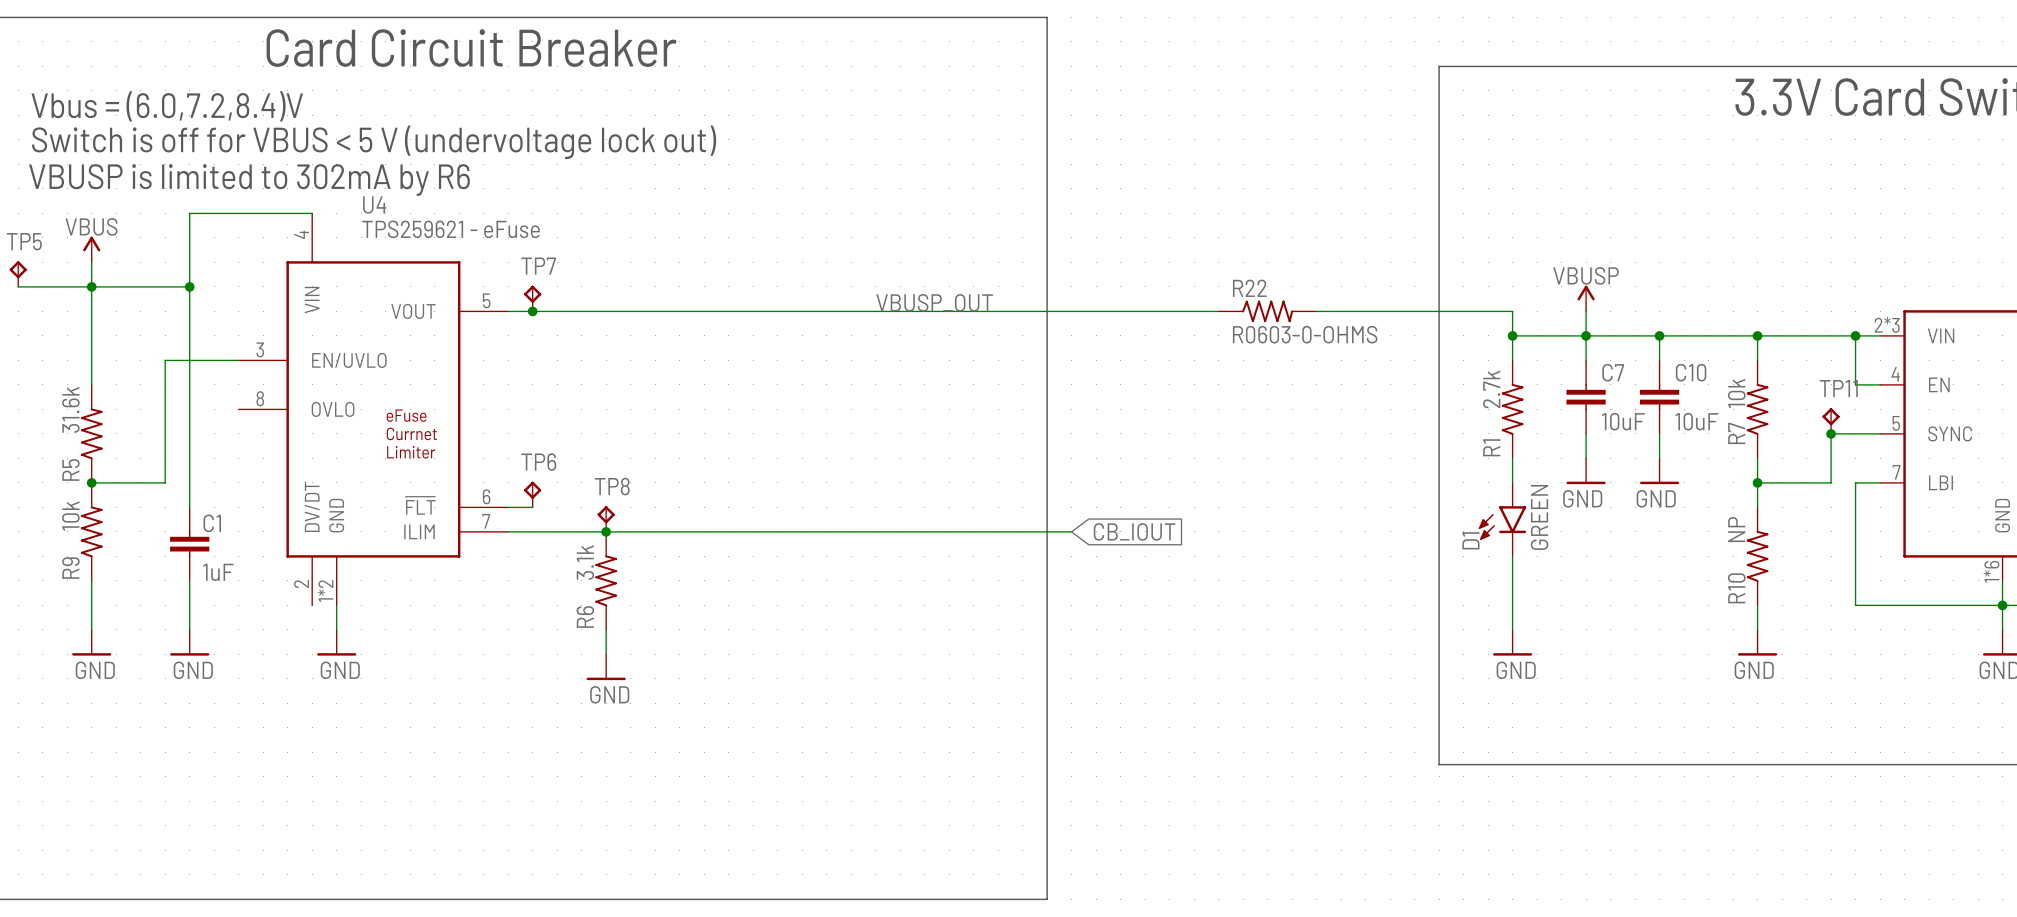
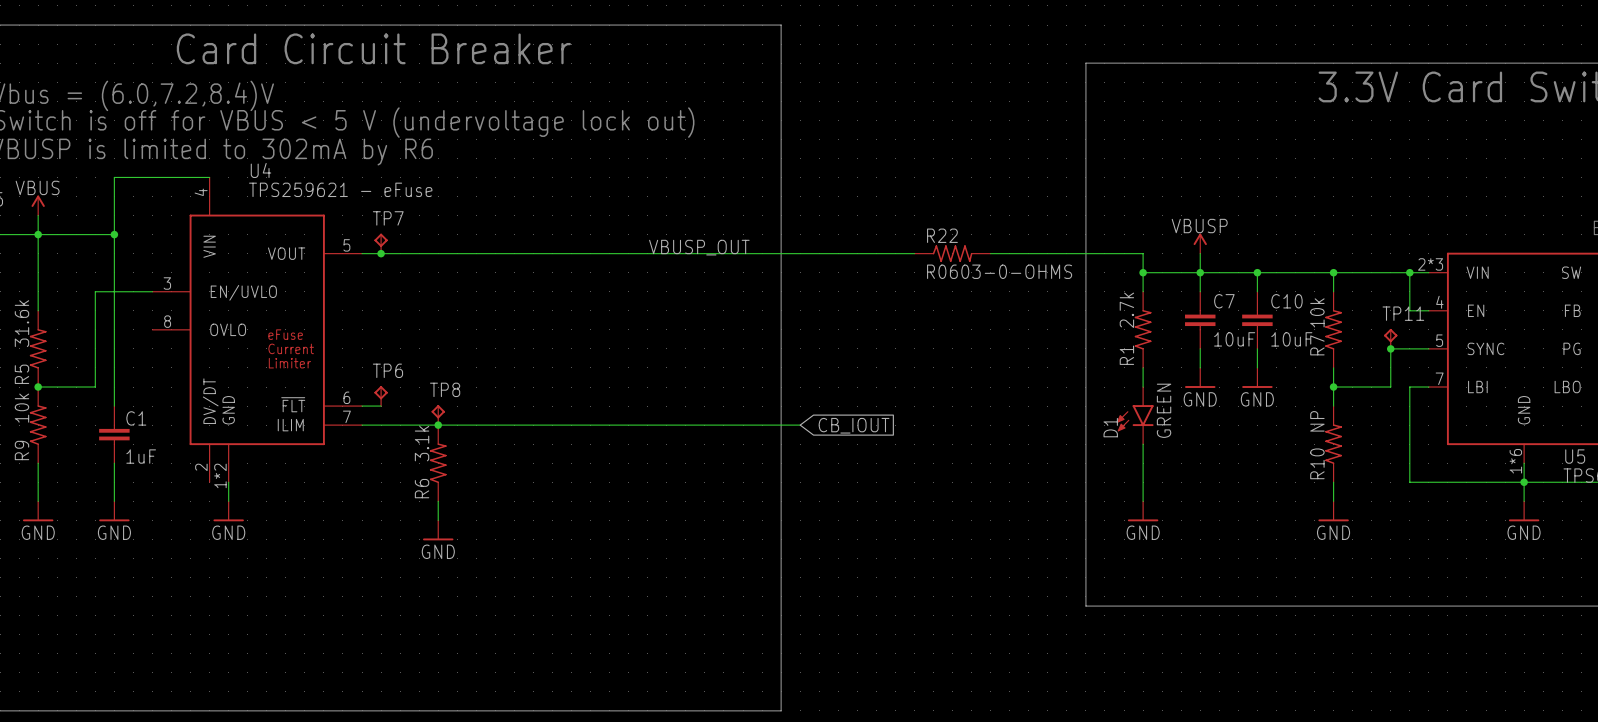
U4 text: Currnet (411, 433) -> Current (291, 348)

